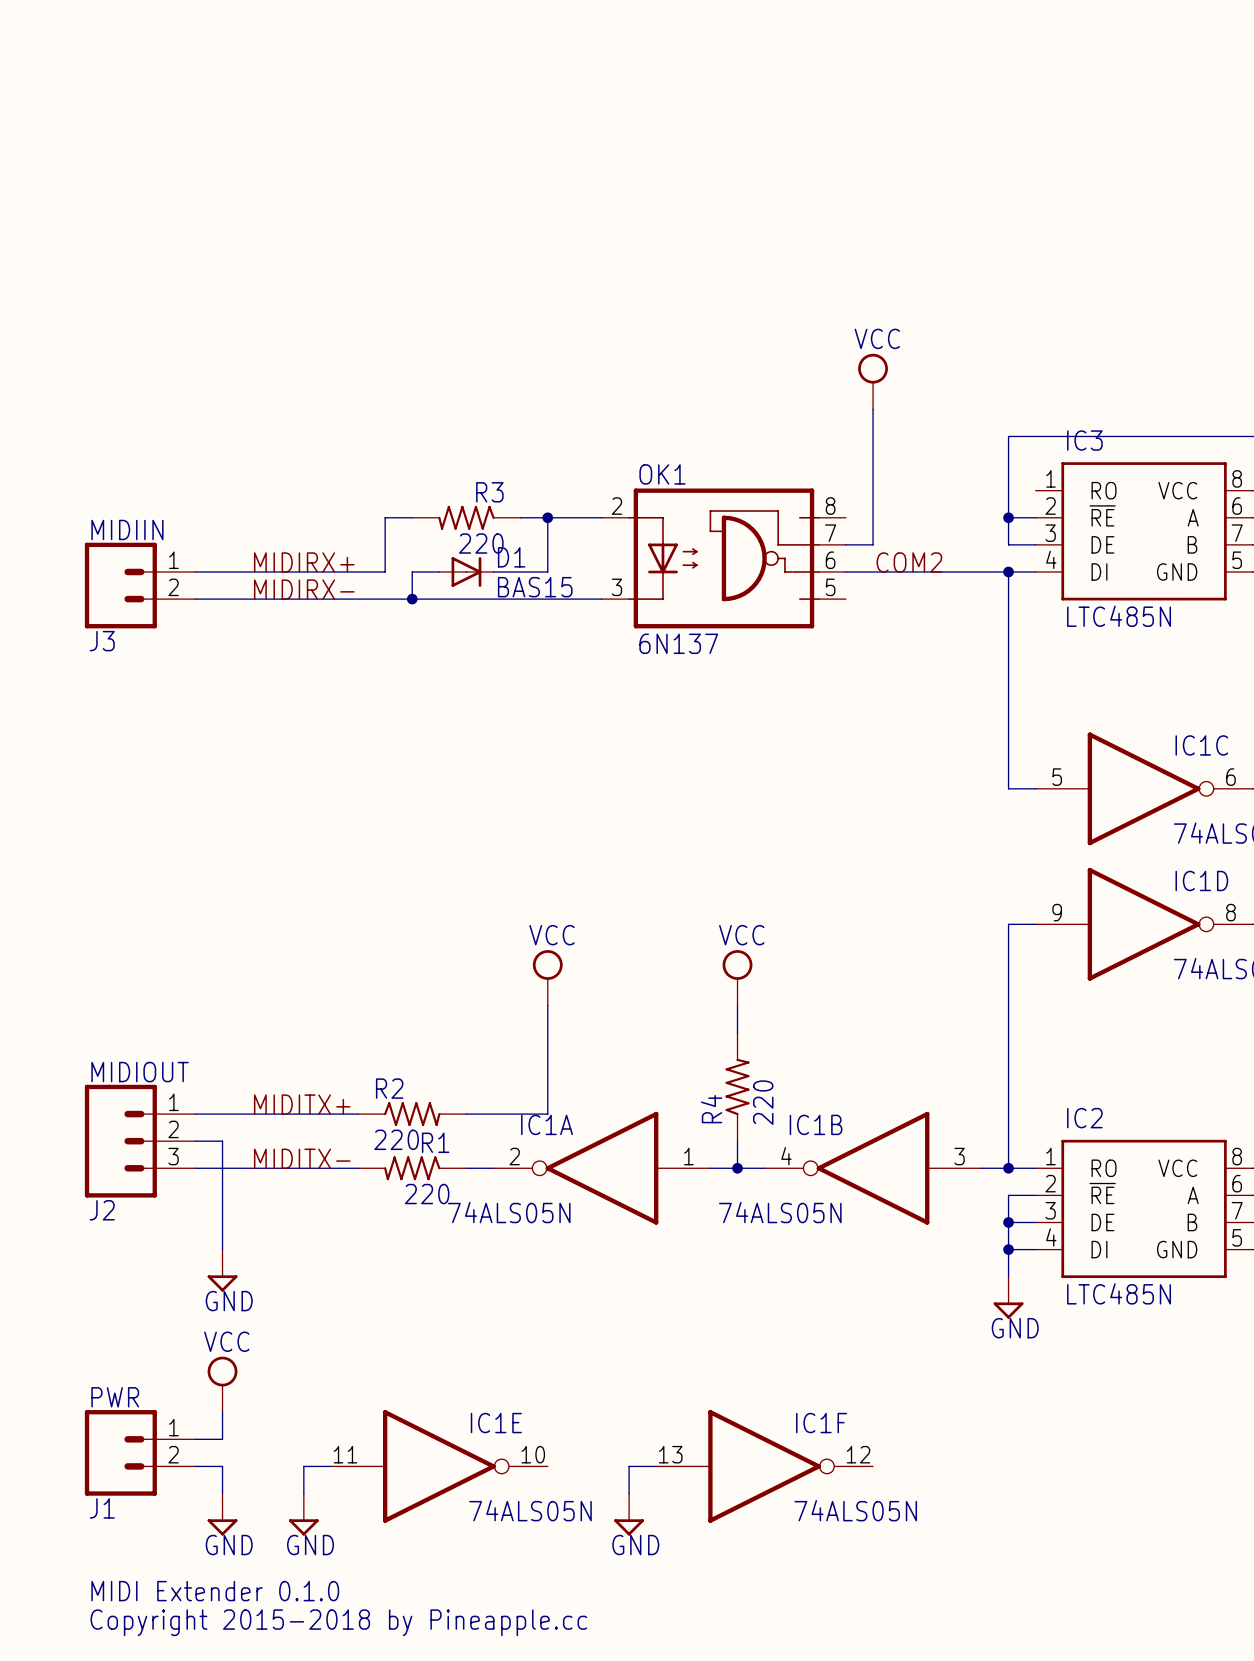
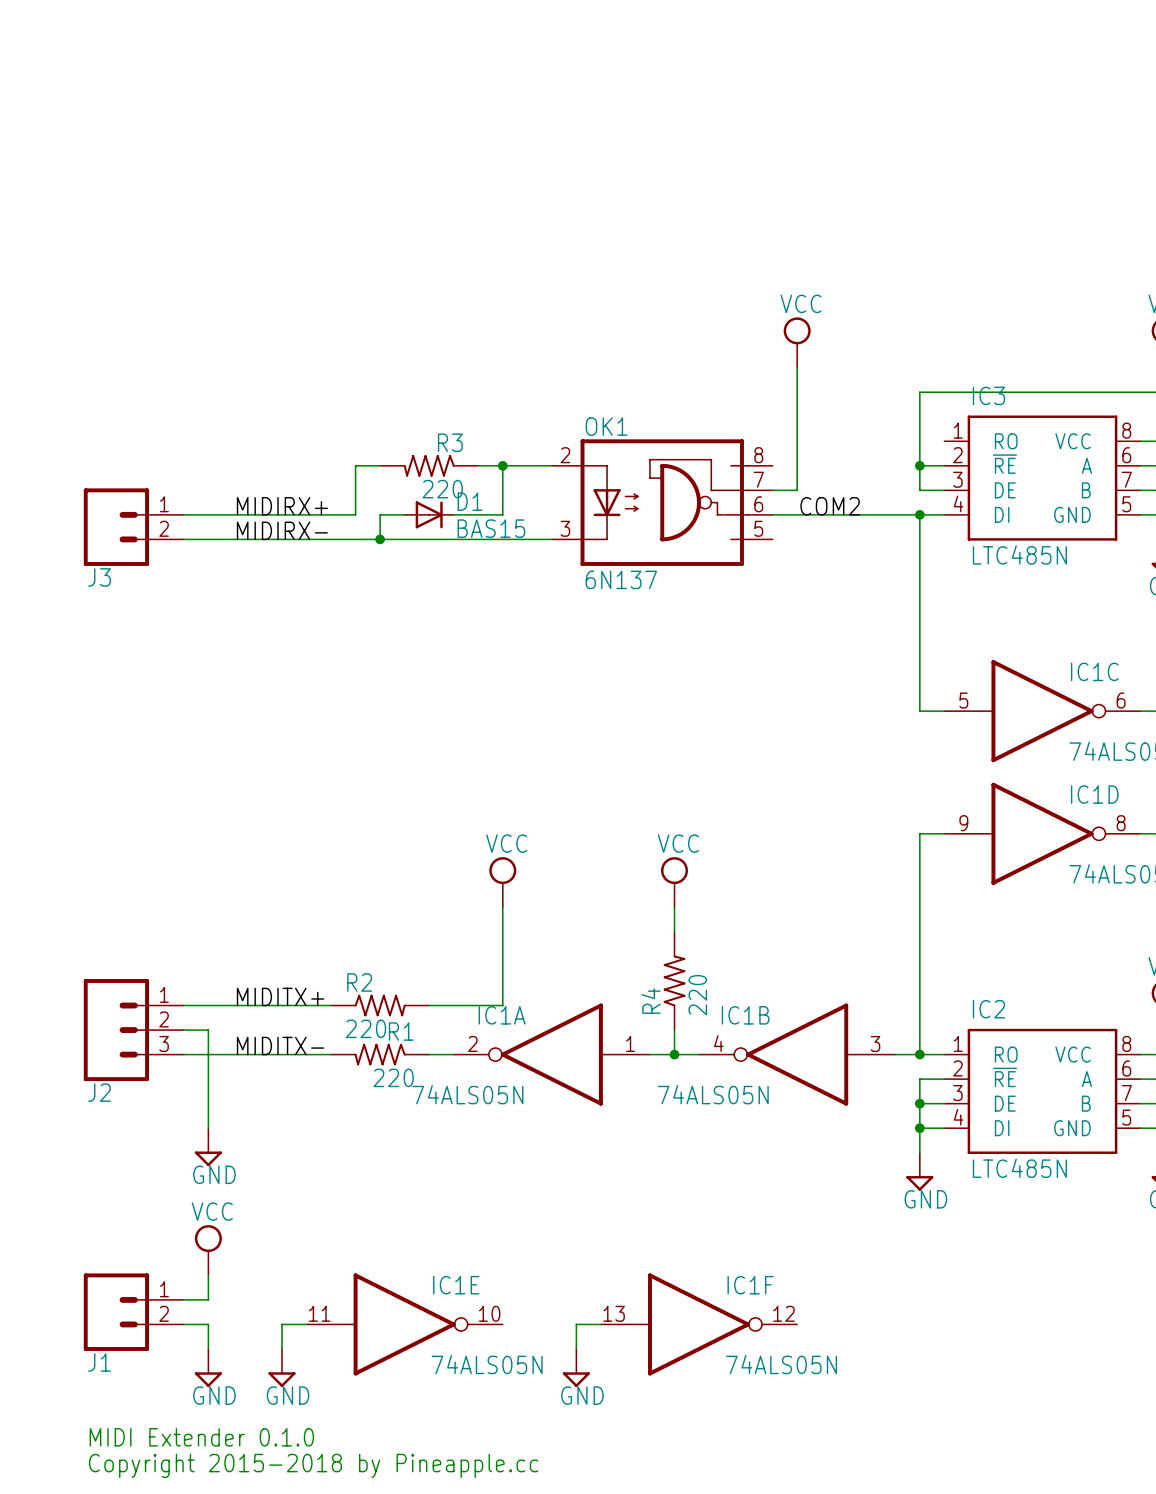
J3 value: MIDIIN (127, 529) -> none
J2 value: MIDIOUT (140, 1072) -> none
J1 value: PWR (115, 1397) -> none

